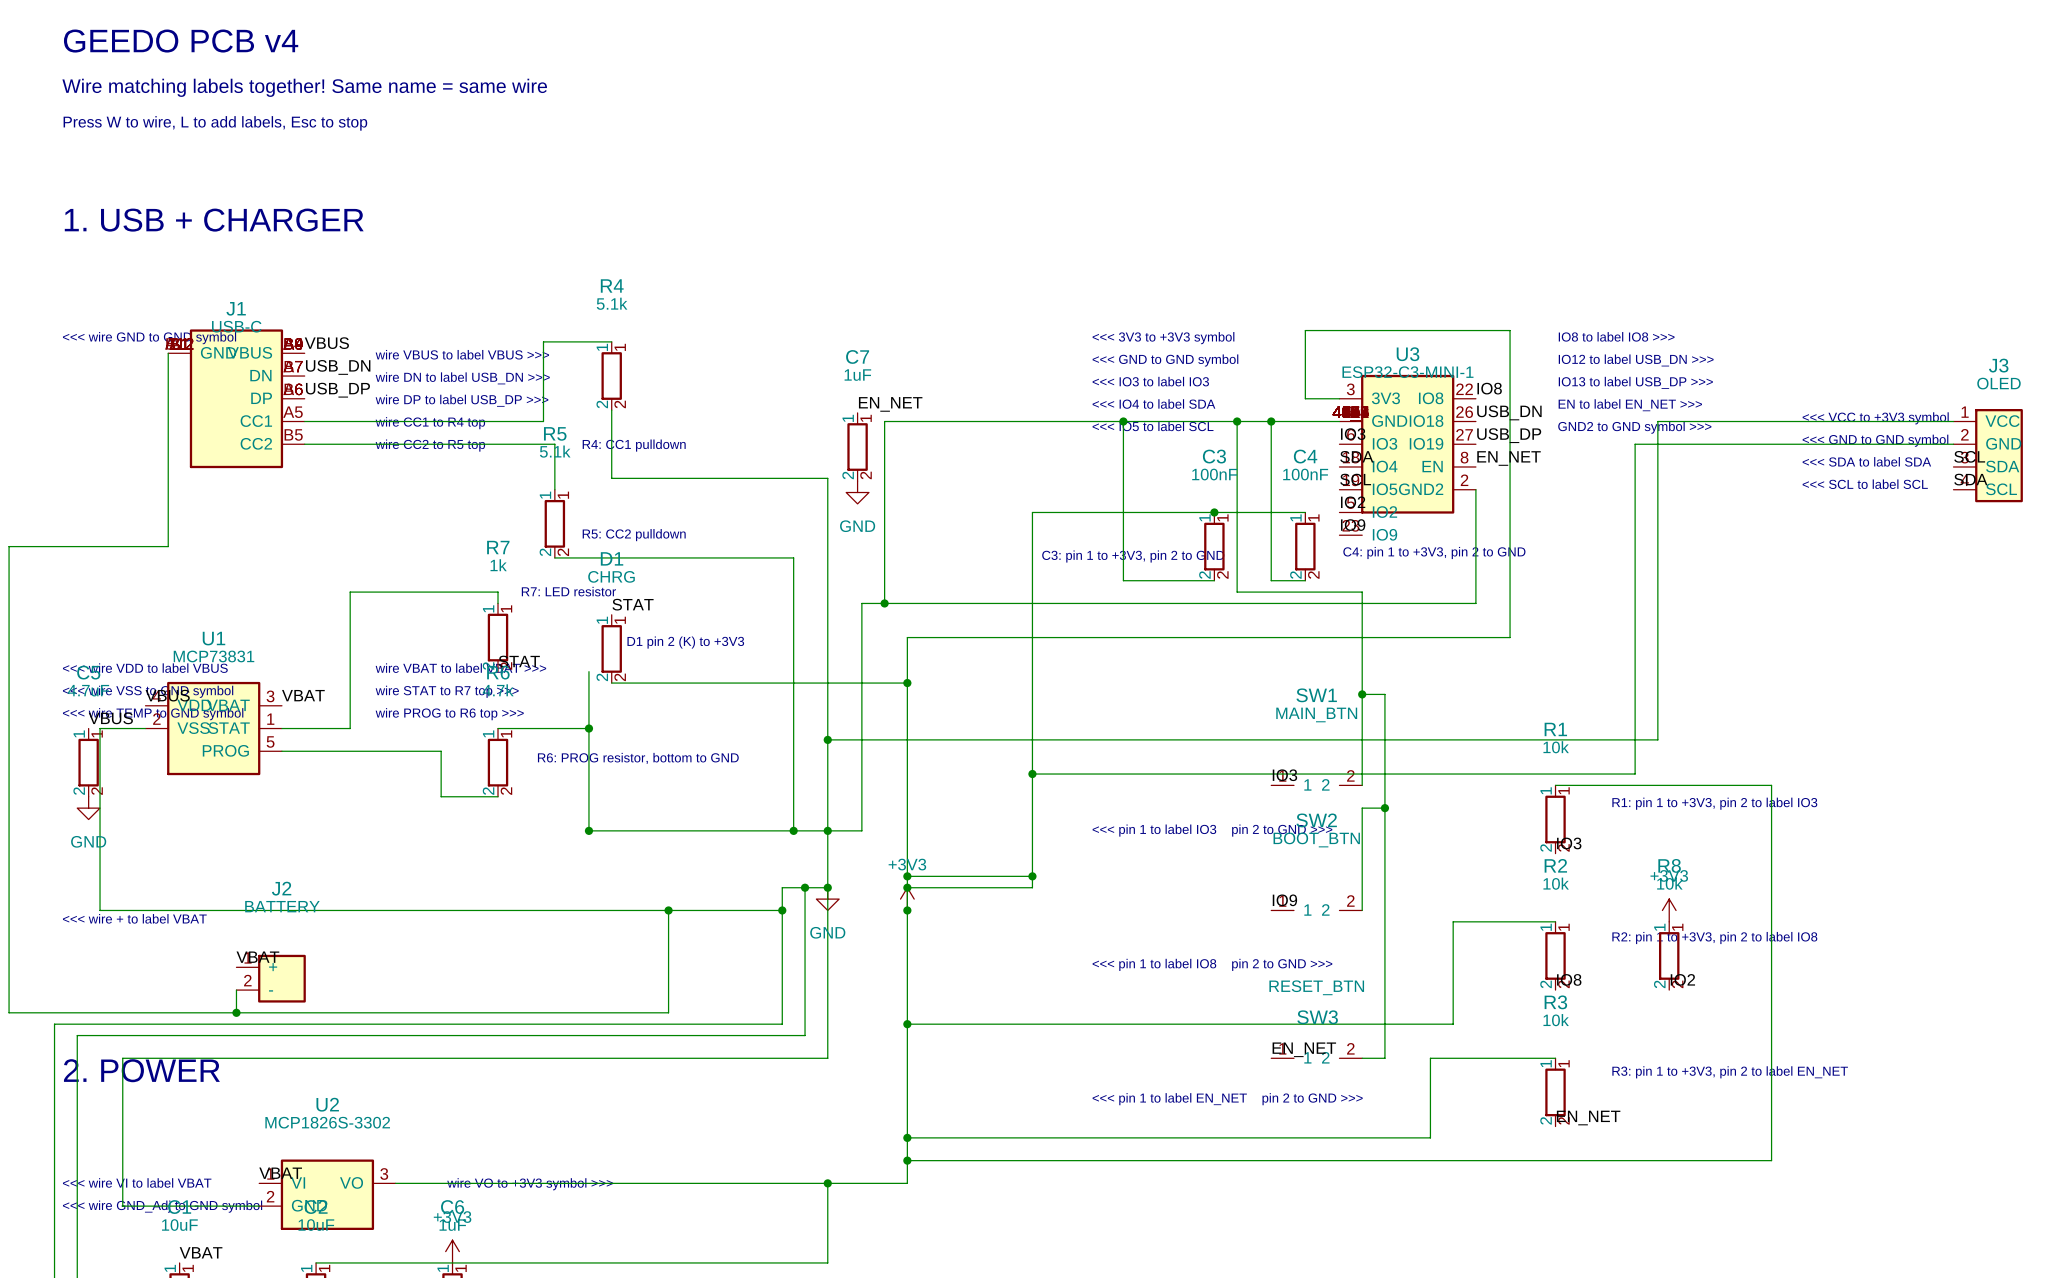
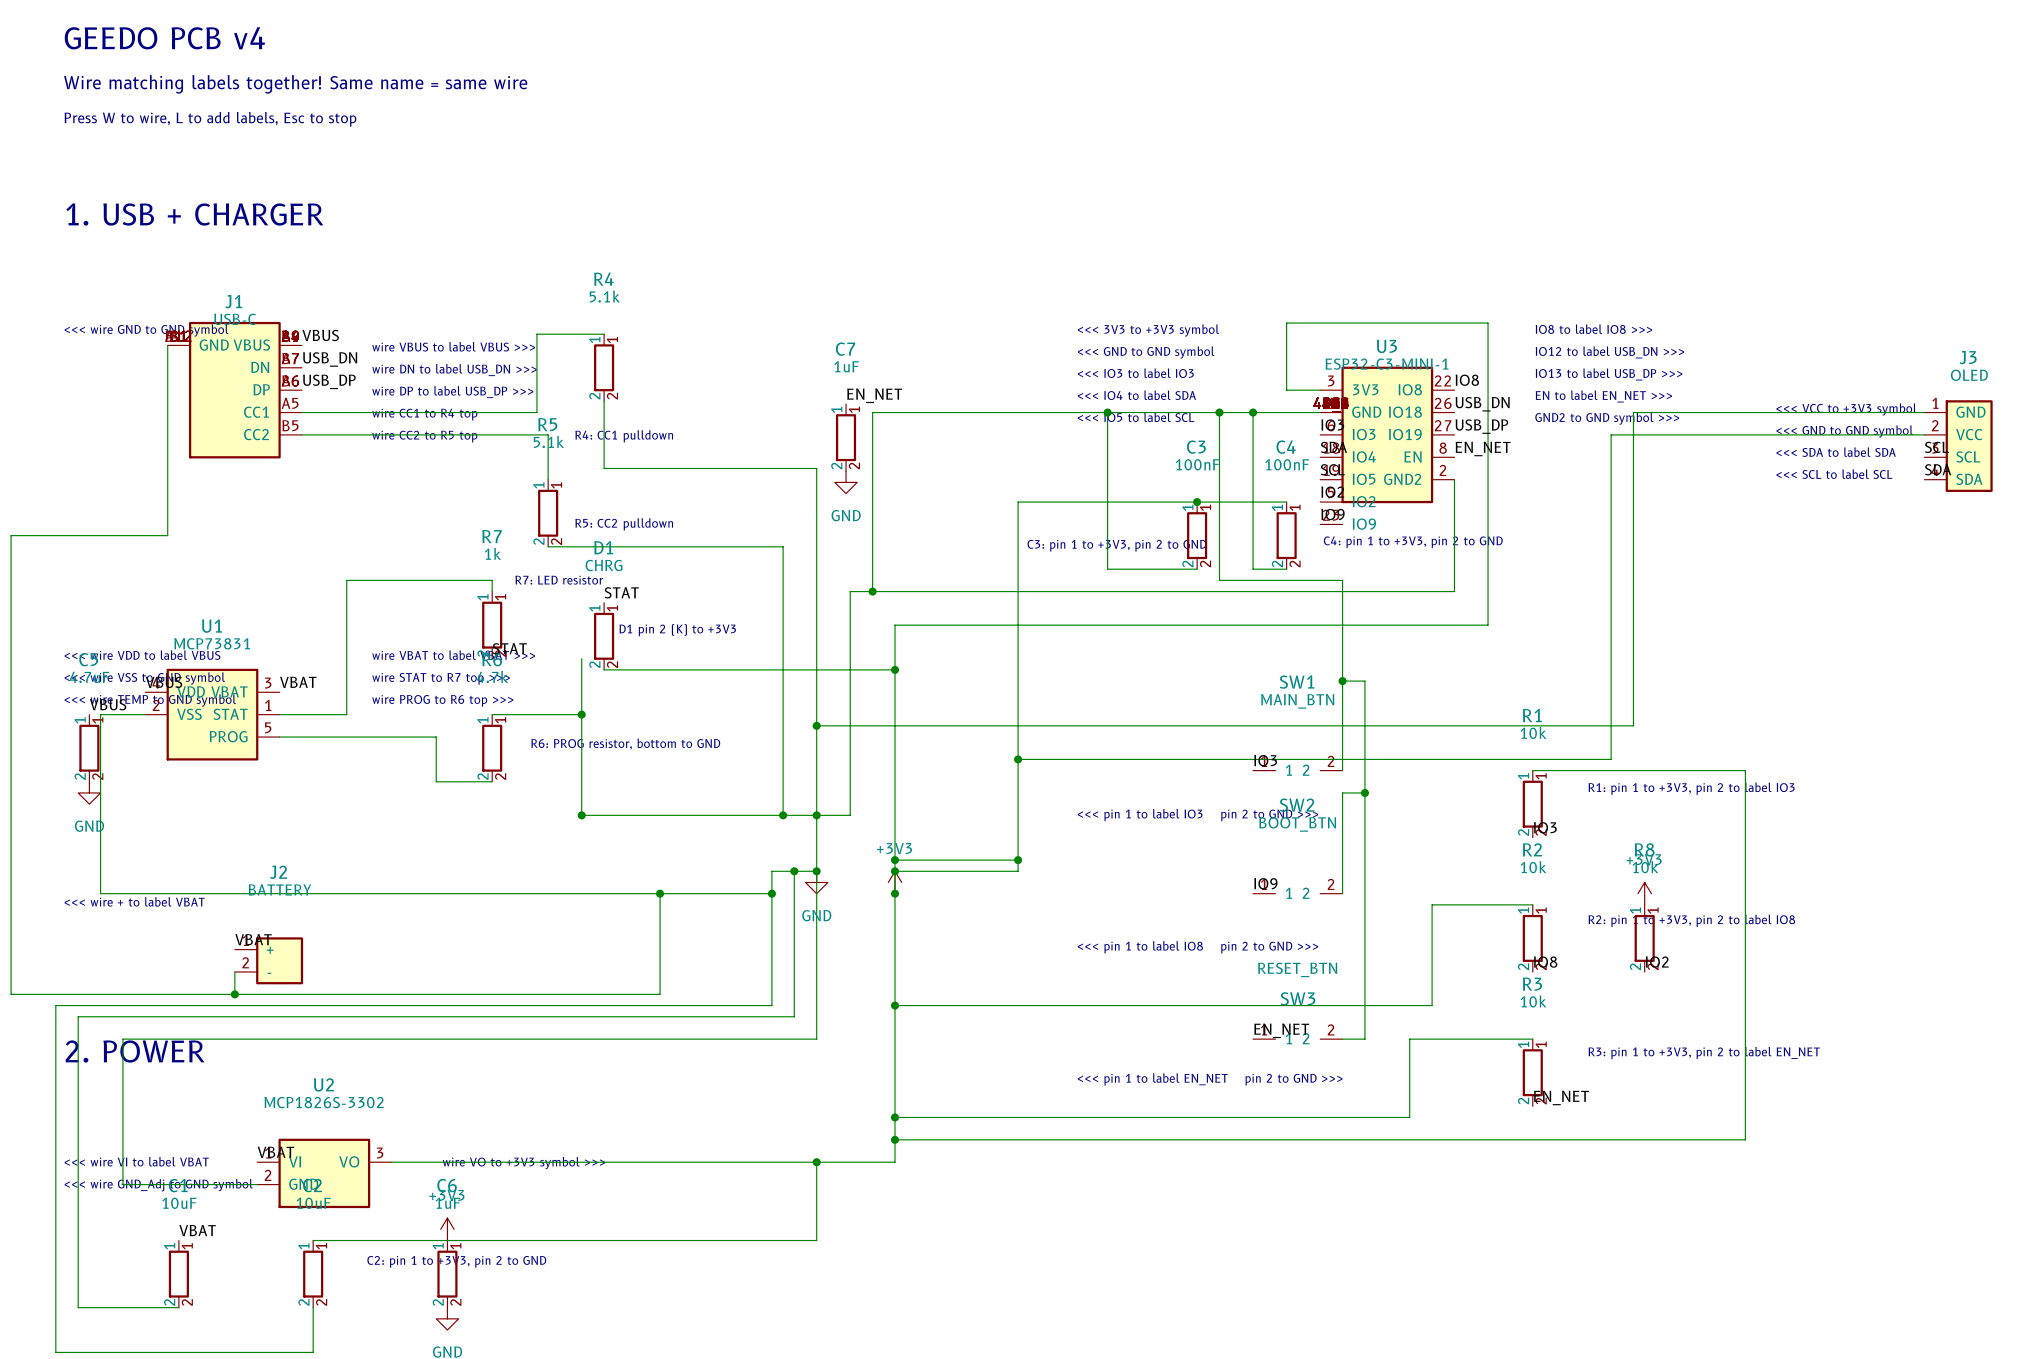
J3 pin name: VCC (2002, 421) -> GND (1970, 412)
J3 pin name: GND (2003, 443) -> VCC (1969, 434)
J3 pin name: SDA (2002, 466) -> SCL (1968, 456)
J3 pin name: SCL (2001, 489) -> SDA (1969, 479)

